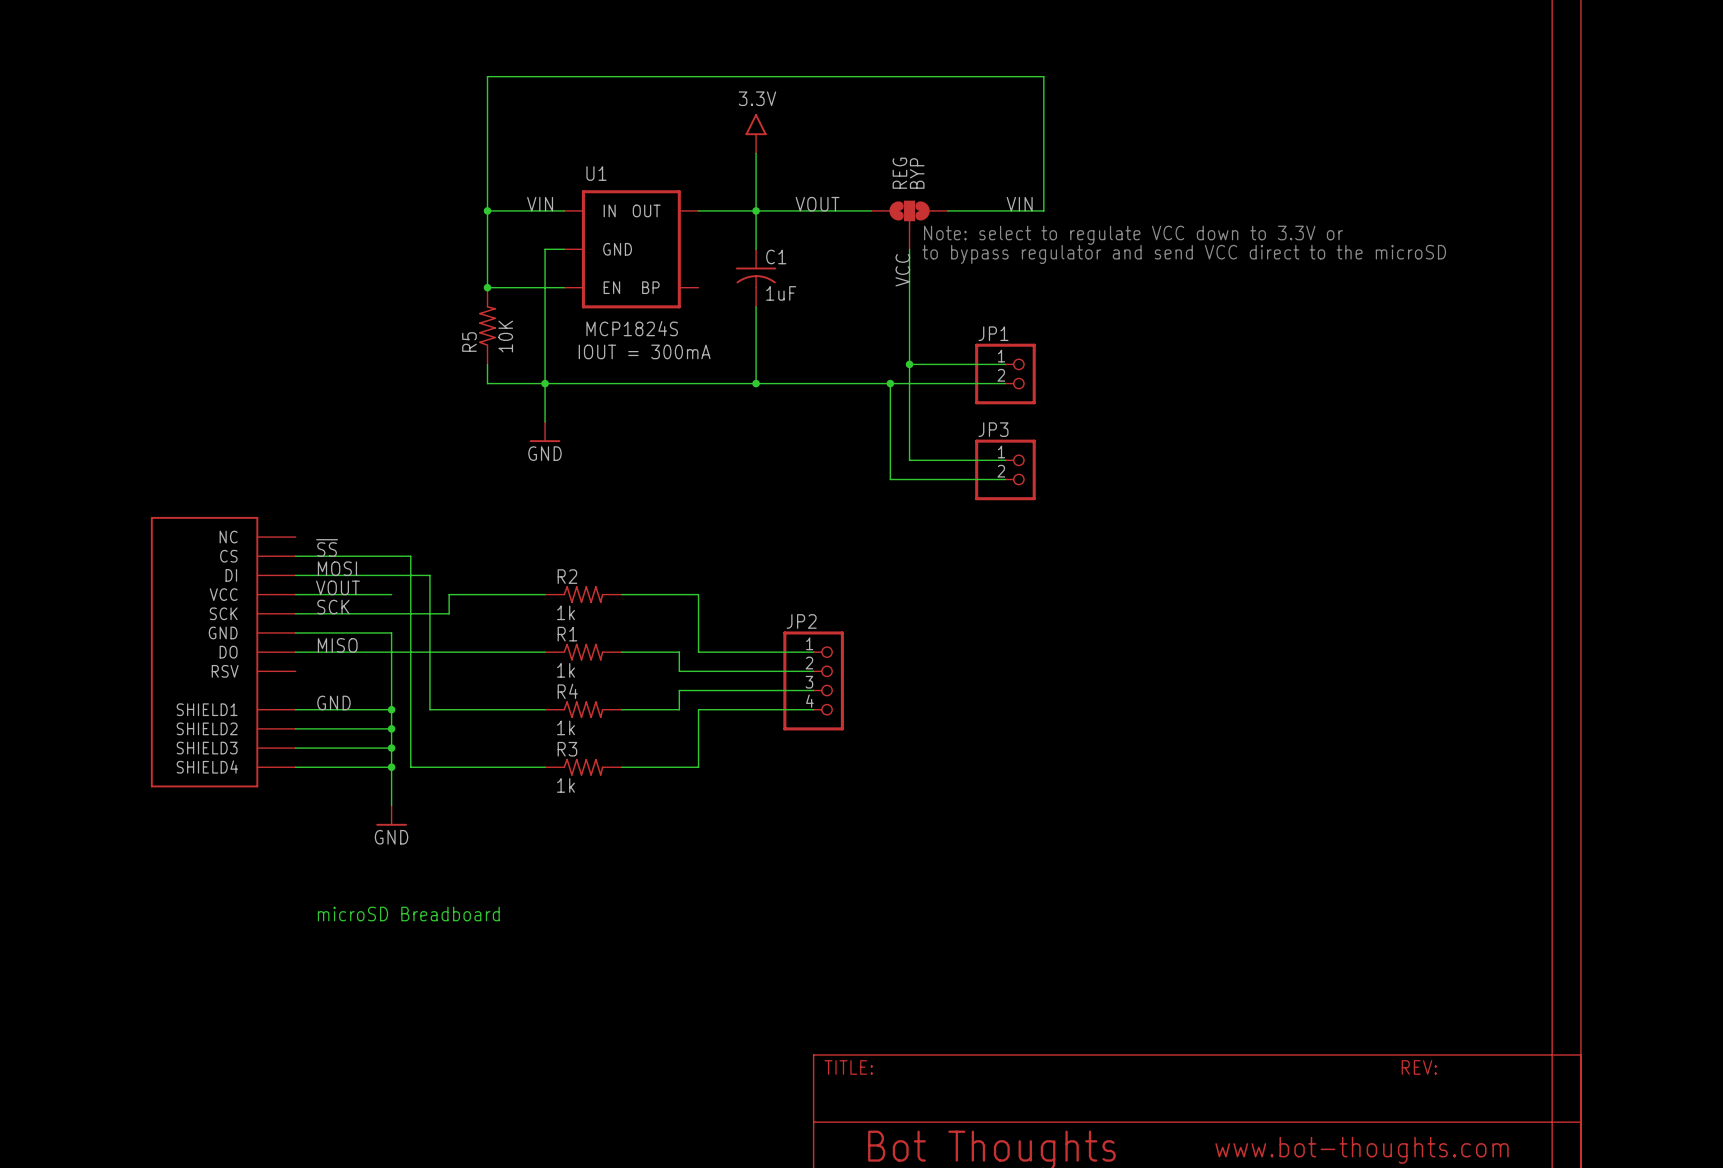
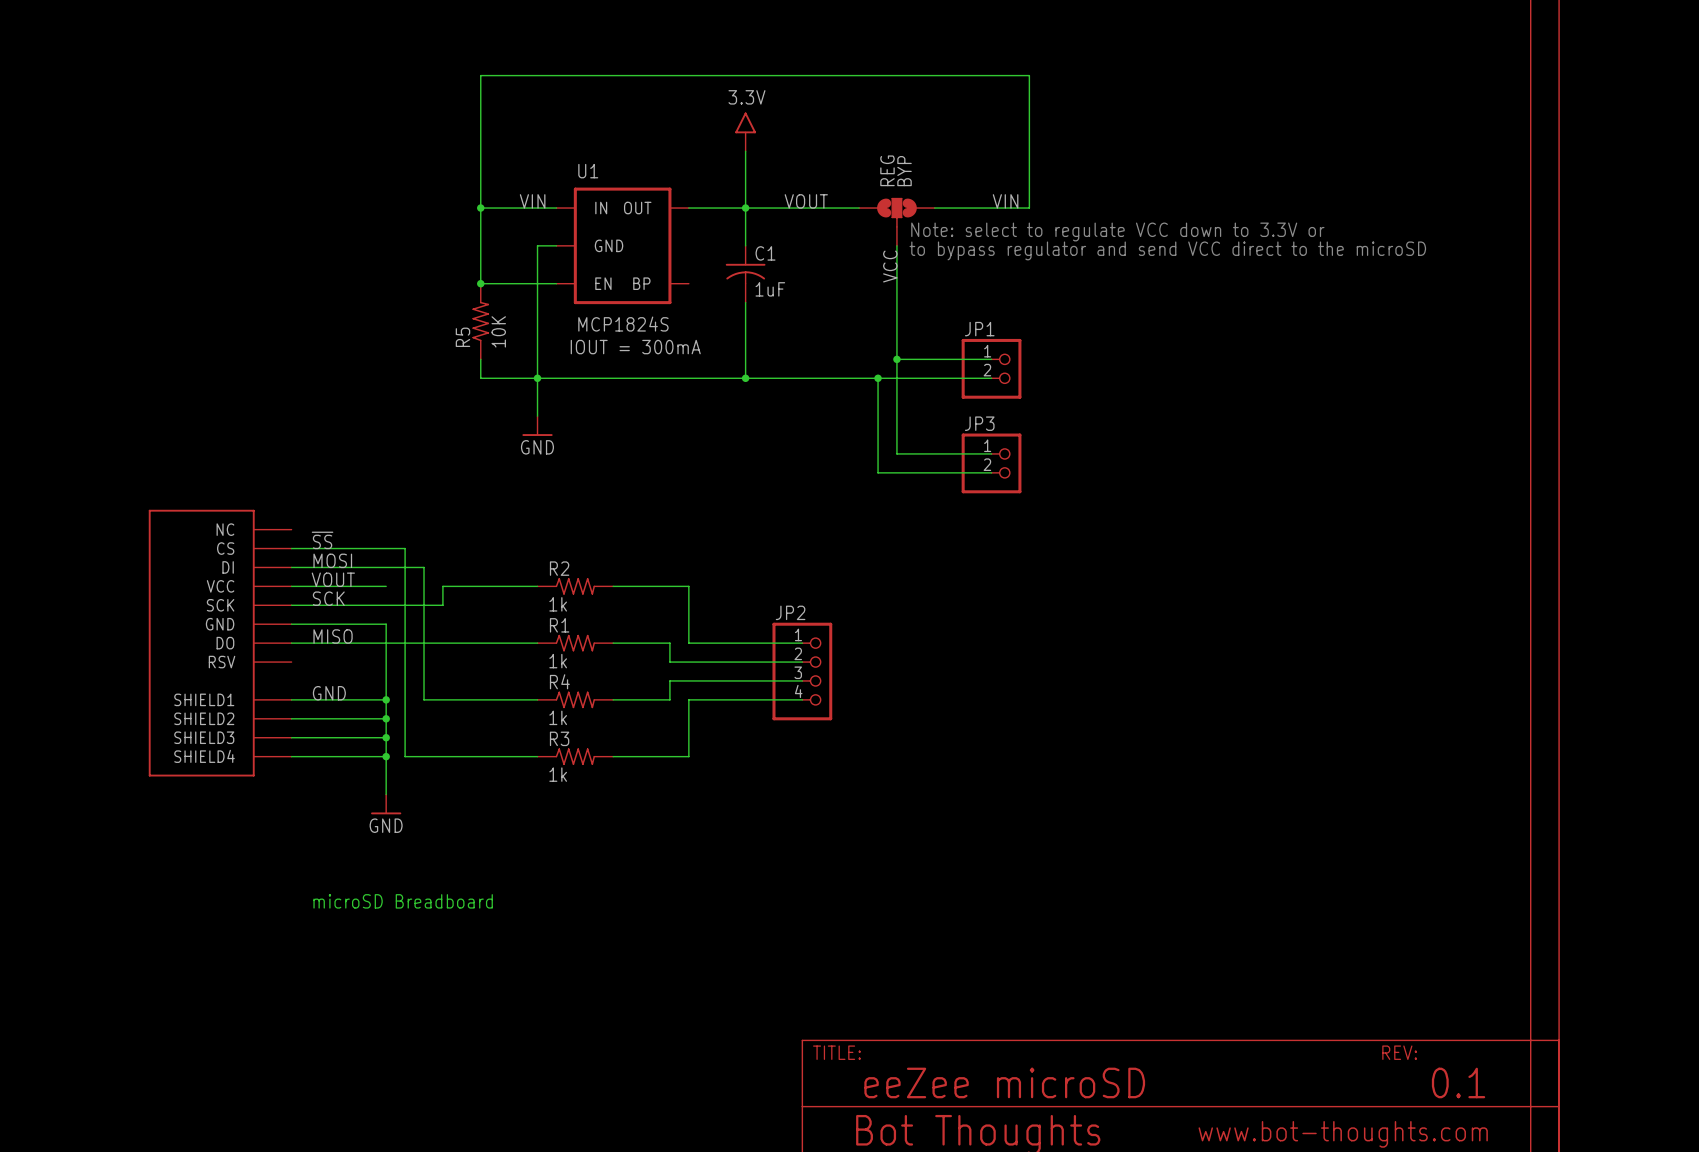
text: none -> eeZee microSD (1004, 1082)
text: none -> 0.1 (1458, 1082)

